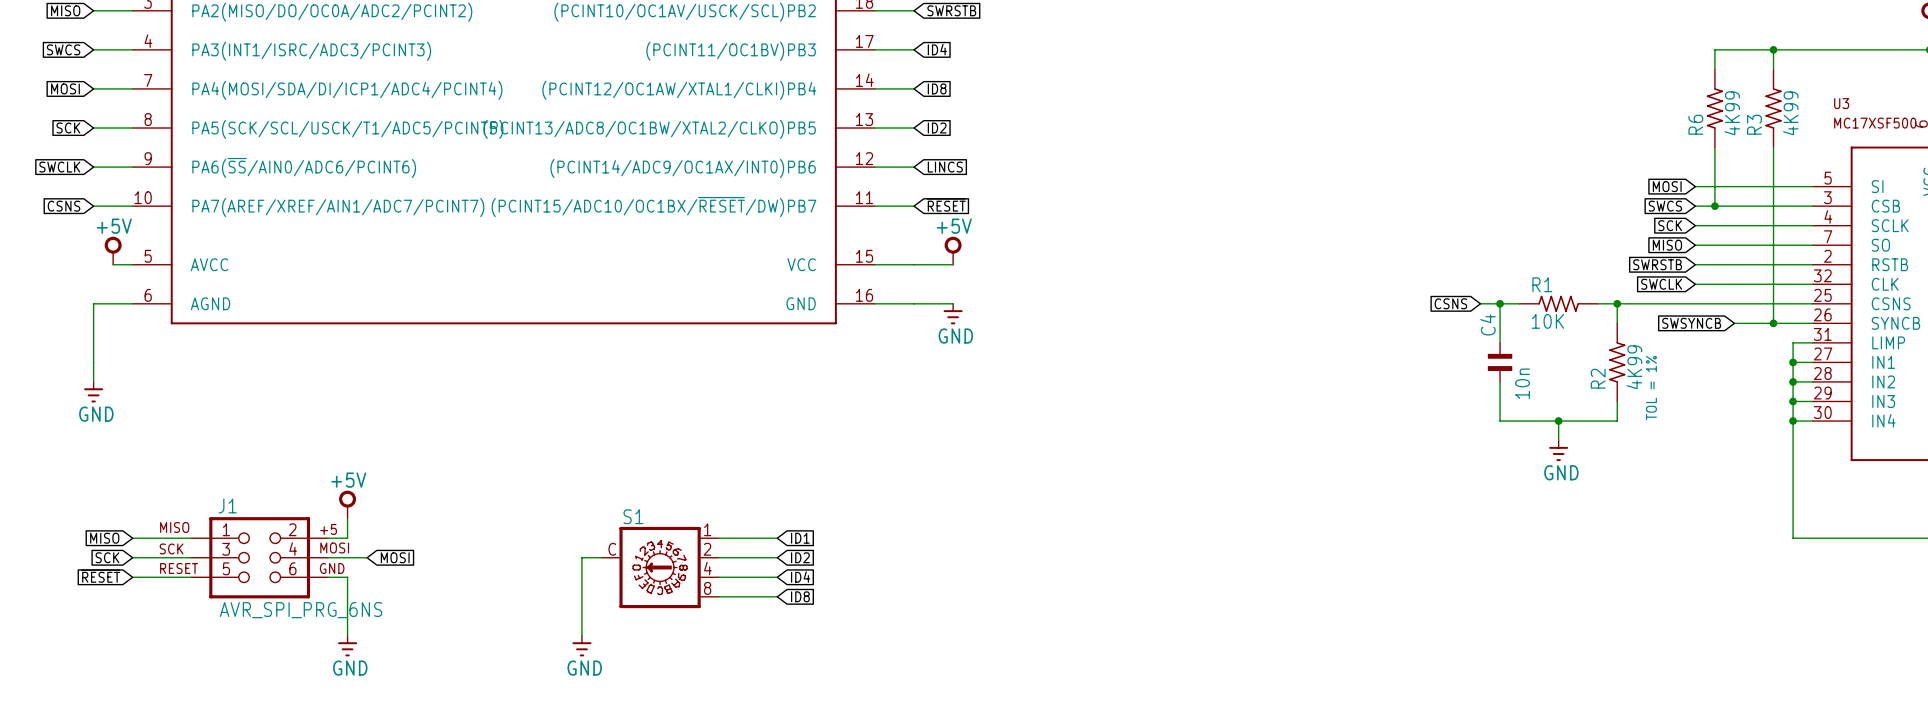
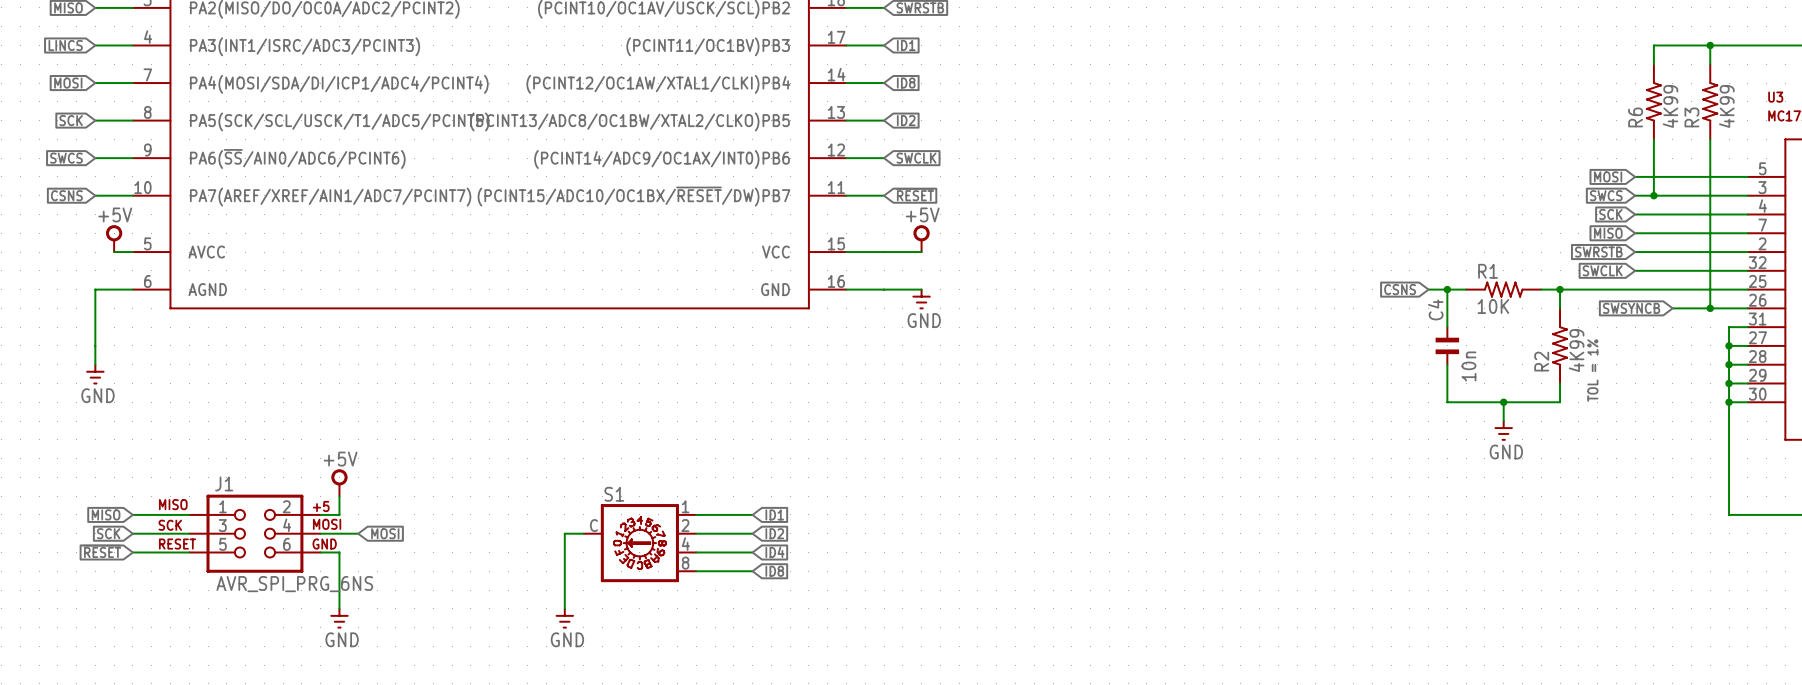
global label: SWCS (63, 49) -> LINCS (65, 45)
global label: ID4 (937, 49) -> ID1 (906, 45)
global label: SWCLK (59, 167) -> SWCS (66, 158)
global label: LINCS (945, 167) -> SWCLK (916, 158)

